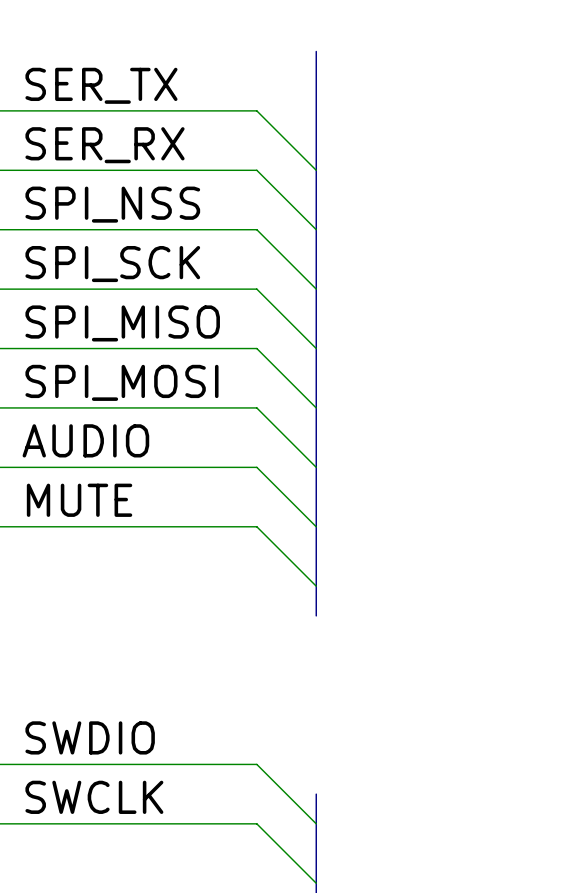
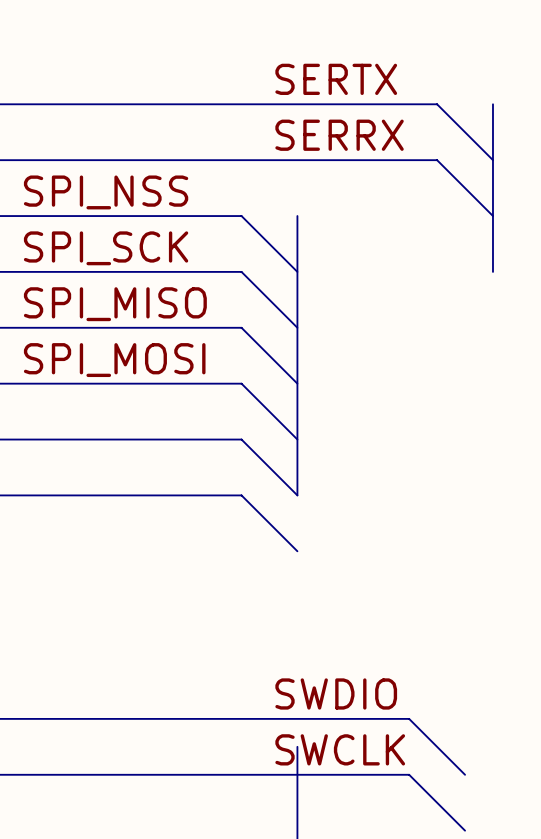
bus: (316, 51) (316, 229) -> (492, 104) (492, 271)
label: none -> SERTX (336, 79)
label: SER_TX (101, 85) -> none
wire: (256, 110) (316, 170) -> (241, 104) (437, 104) (492, 160)
label: none -> SERRX (339, 135)
label: SER_RX (105, 145) -> none
wire: (256, 170) (316, 229) -> (241, 160) (437, 160) (492, 216)
label: AUDIO (85, 440) -> none
label: MUTE (79, 500) -> none
bus: (316, 526) (316, 615) -> none
label position: SWDIO (90, 737) -> SWDIO (336, 693)
wire: (256, 764) (316, 823) -> (241, 718) (409, 718) (465, 774)
label position: SWCLK (94, 797) -> SWCLK (340, 749)
wire: (256, 823) (316, 883) -> (241, 774) (409, 774) (465, 830)

